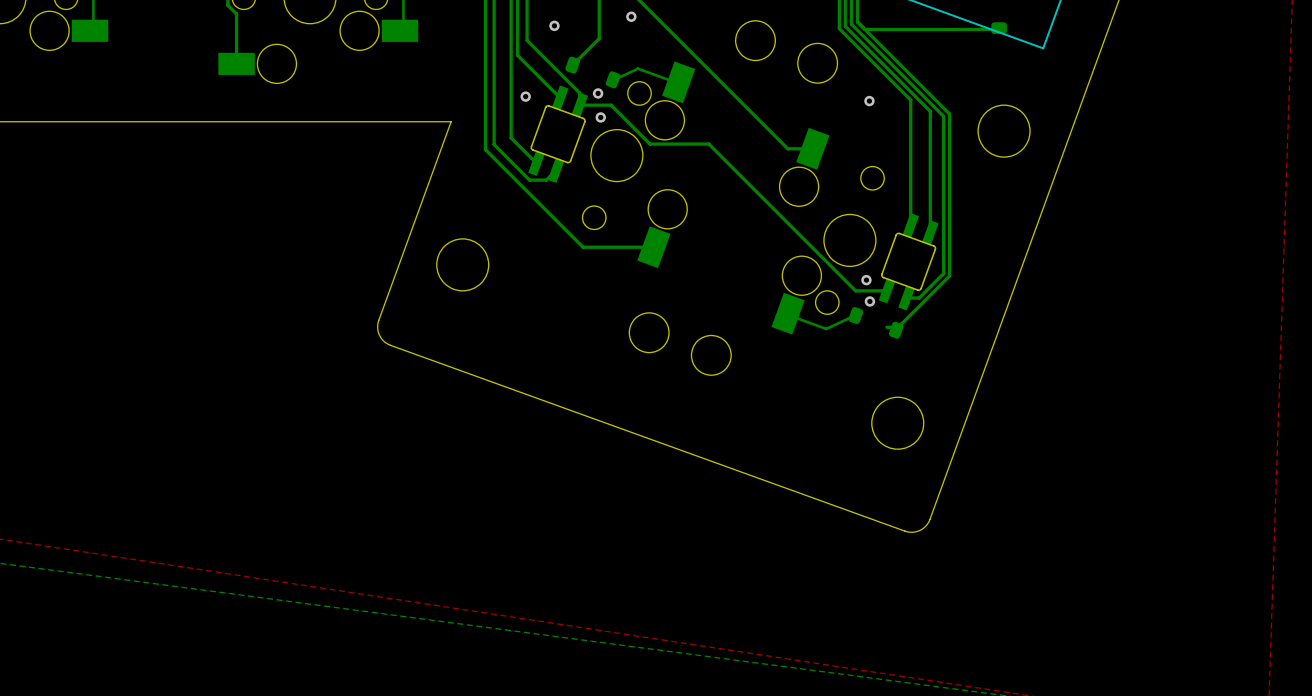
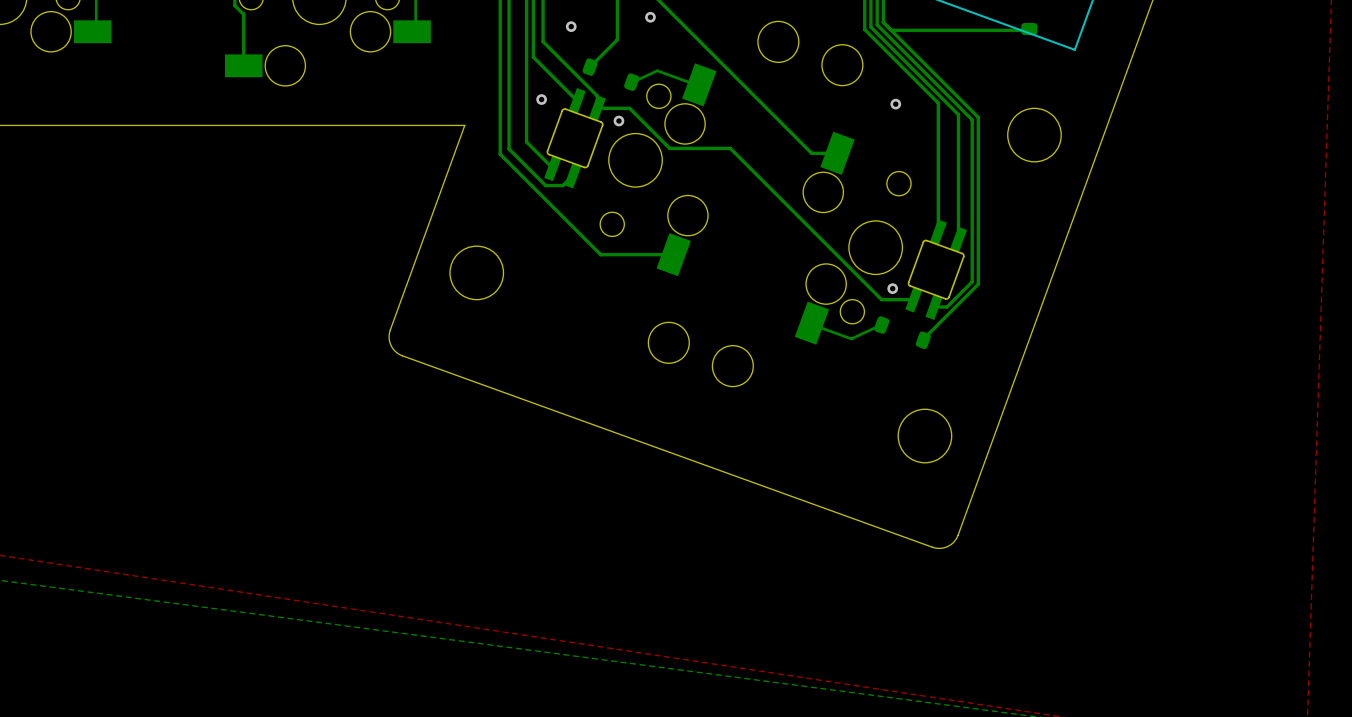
via: (598, 93) -> none
via: (869, 301) -> none
bottom track: (886, 327) (898, 327) -> none

